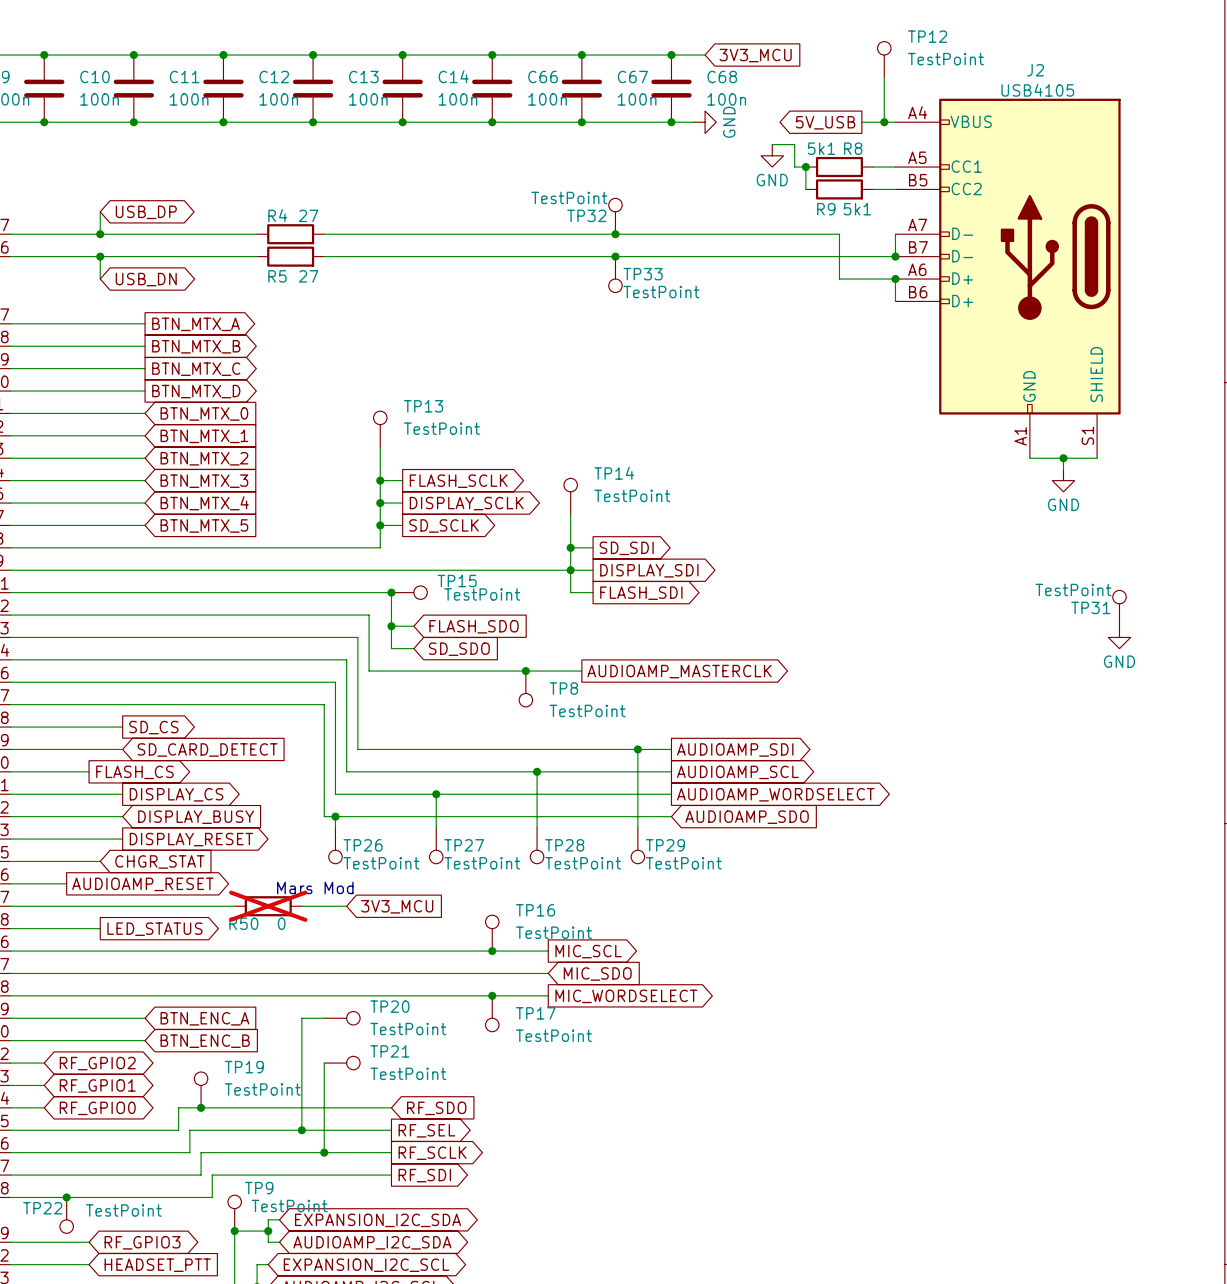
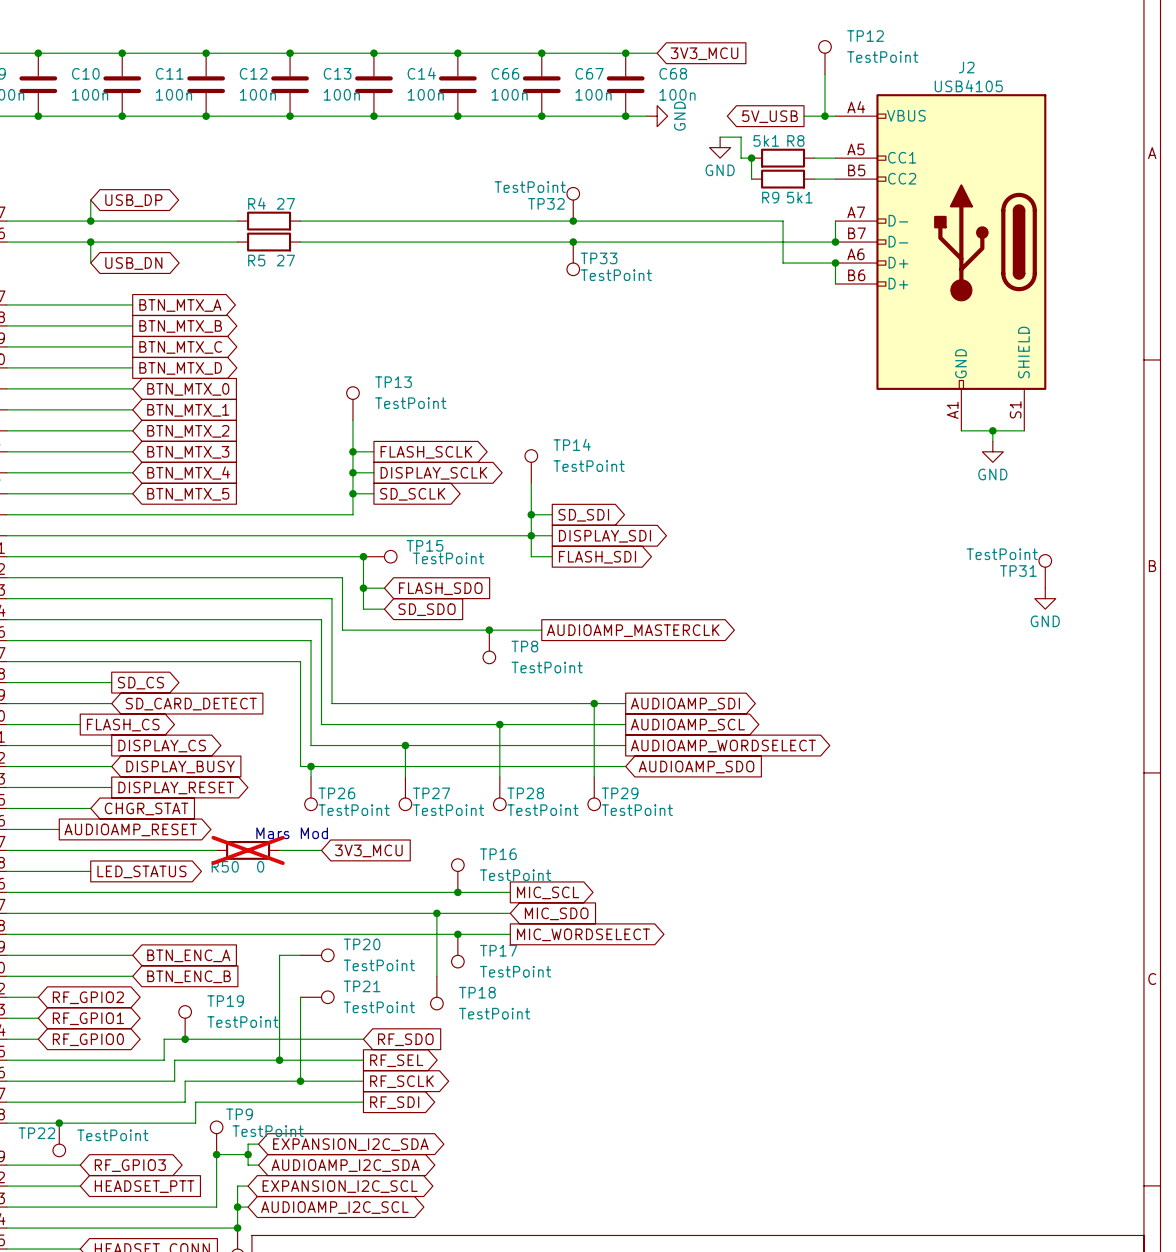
wire: none -> (436, 913) (436, 976)
junction: none -> (436, 913)
TP18: none -> TestPoint (436, 993)

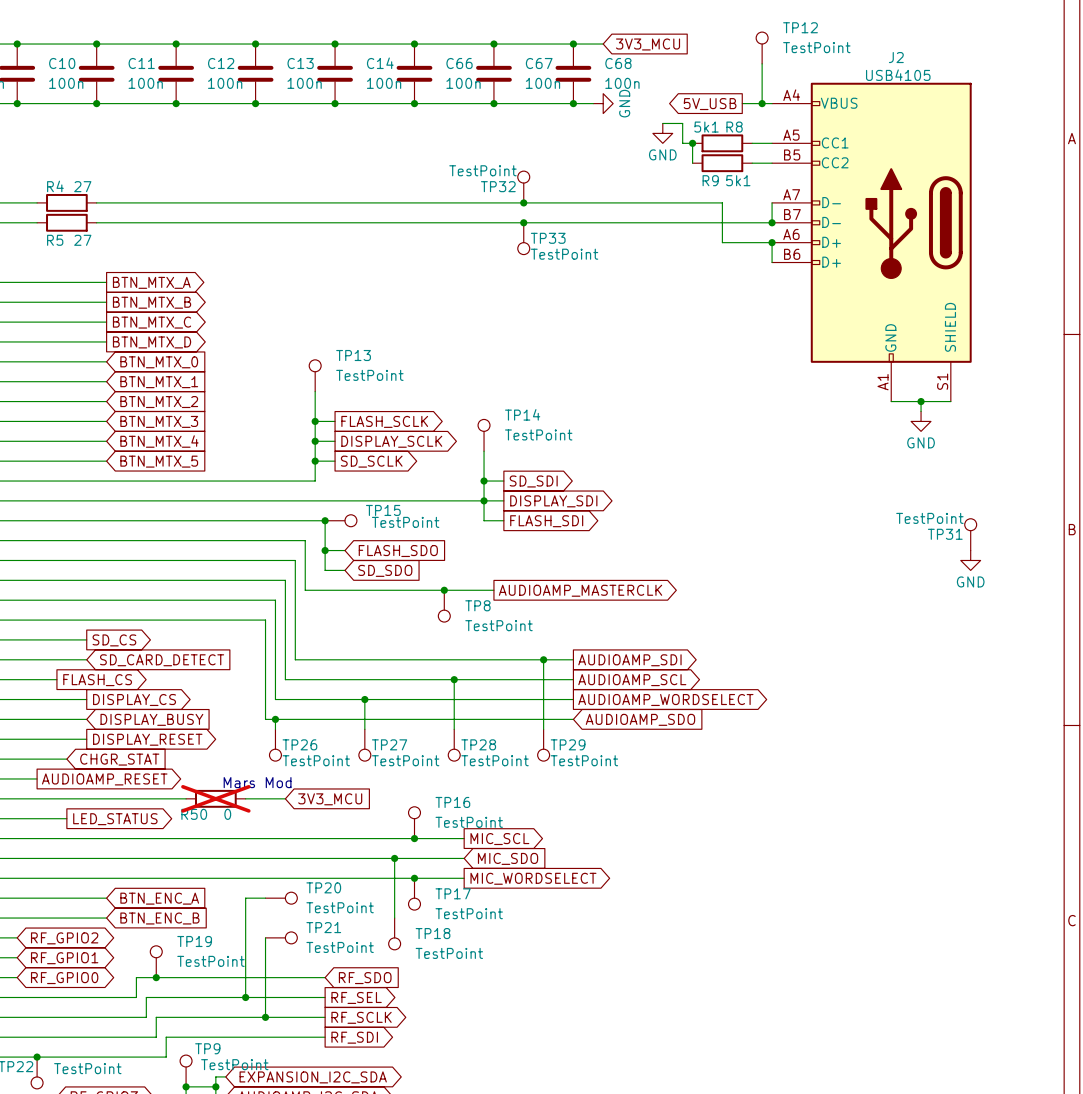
wire: (90, 200) (90, 221) -> none
global label: USB_DP (133, 200) -> none
wire: (59, 221) (122, 221) -> (205, 202) (265, 202)
junction: (90, 221) -> none
R4 position: (269, 221) -> (66, 202)
wire: (59, 242) (122, 242) -> (205, 222) (265, 222)
wire: (90, 242) (90, 263) -> none
junction: (90, 242) -> none
R5 position: (269, 242) -> (66, 222)
global label: USB_DN (133, 263) -> none

